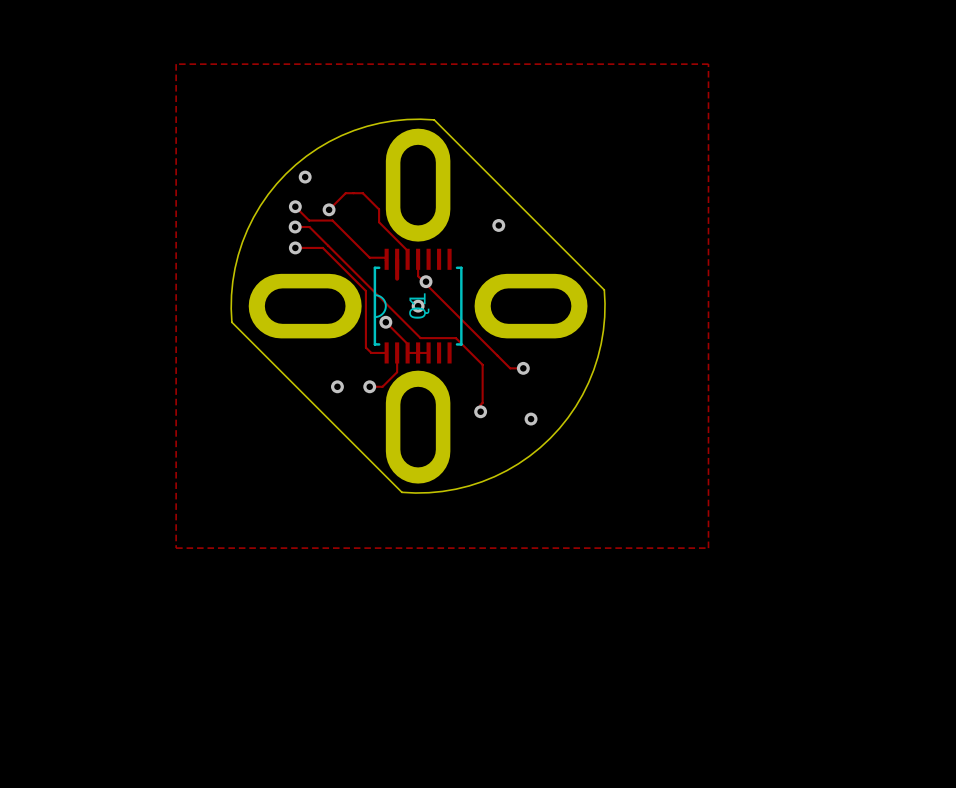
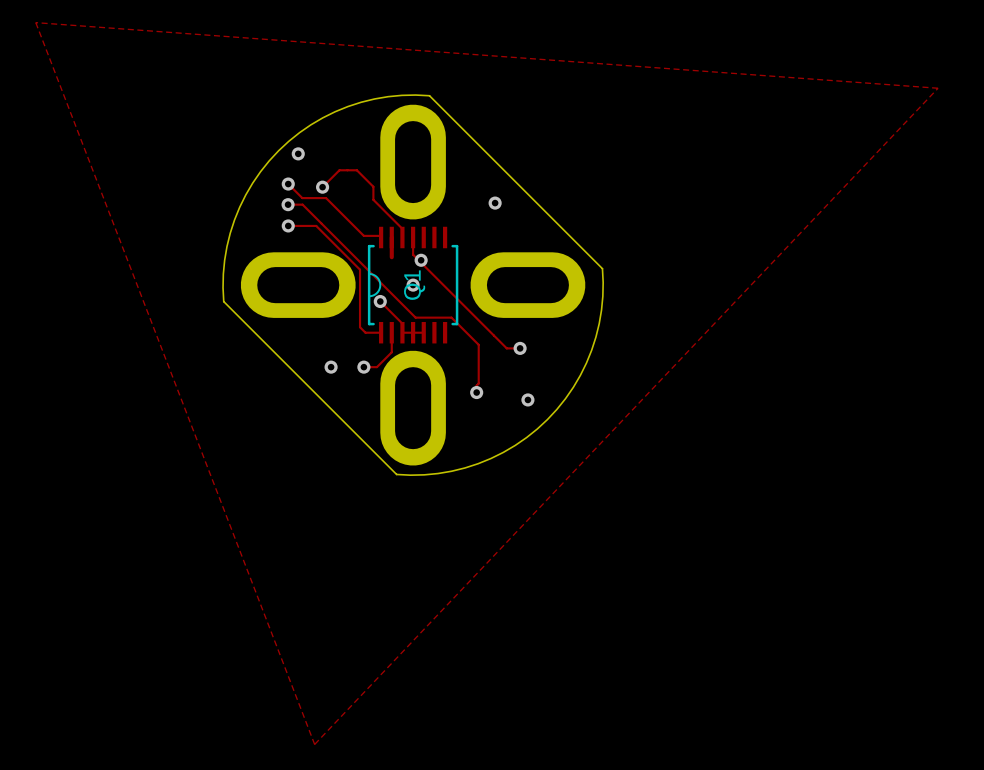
zone outline: none -> (35, 22) (938, 88) (314, 744) (35, 22)
zone outline: (176, 64) (708, 64) (708, 548) (176, 548) (176, 64) -> none

